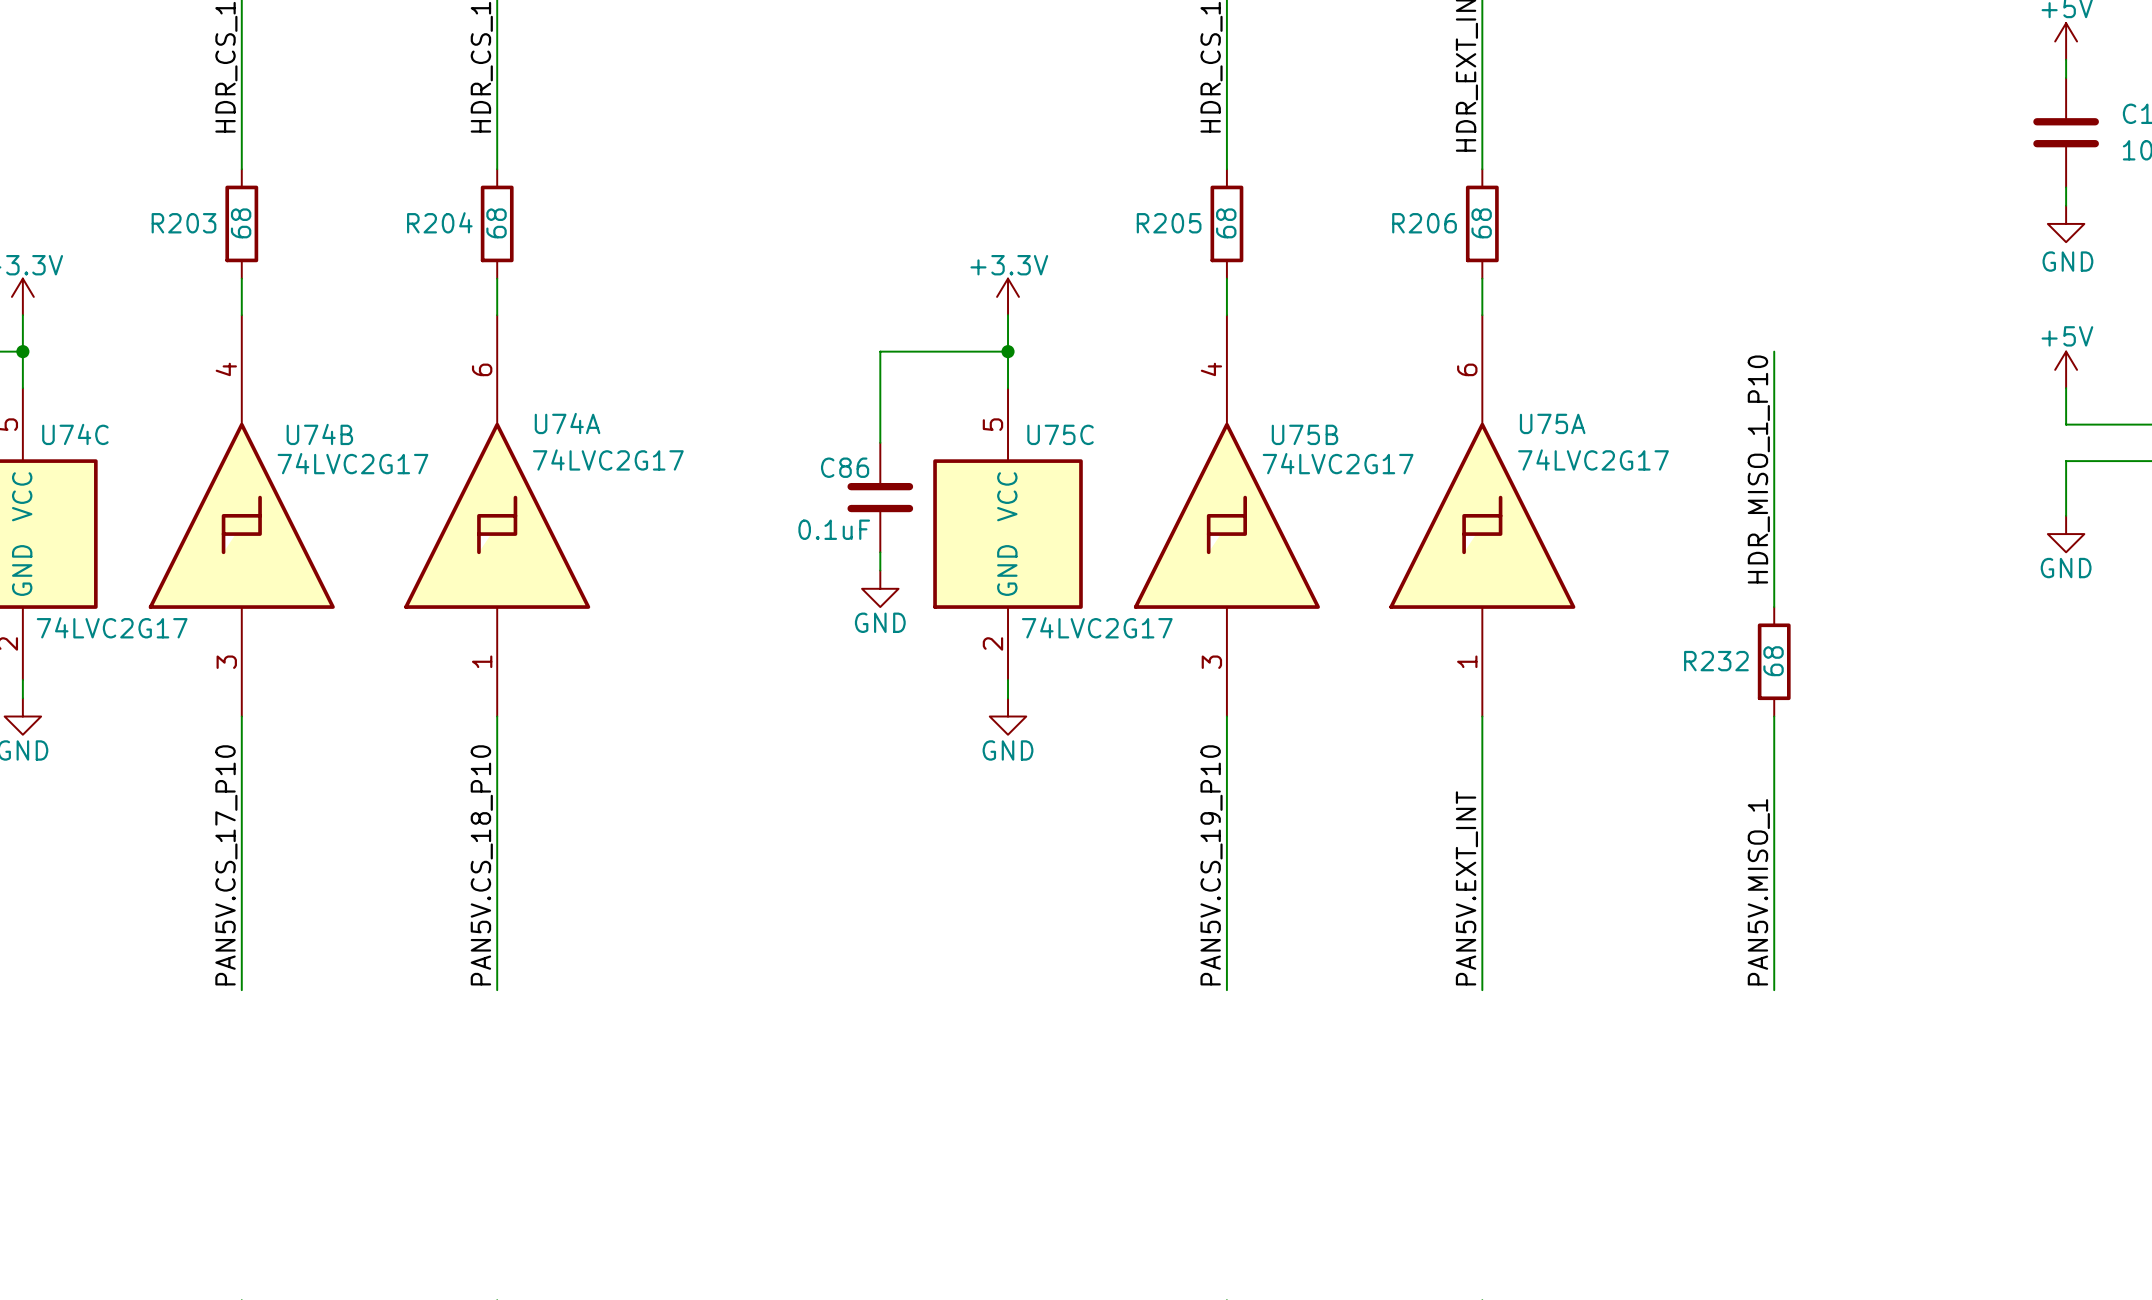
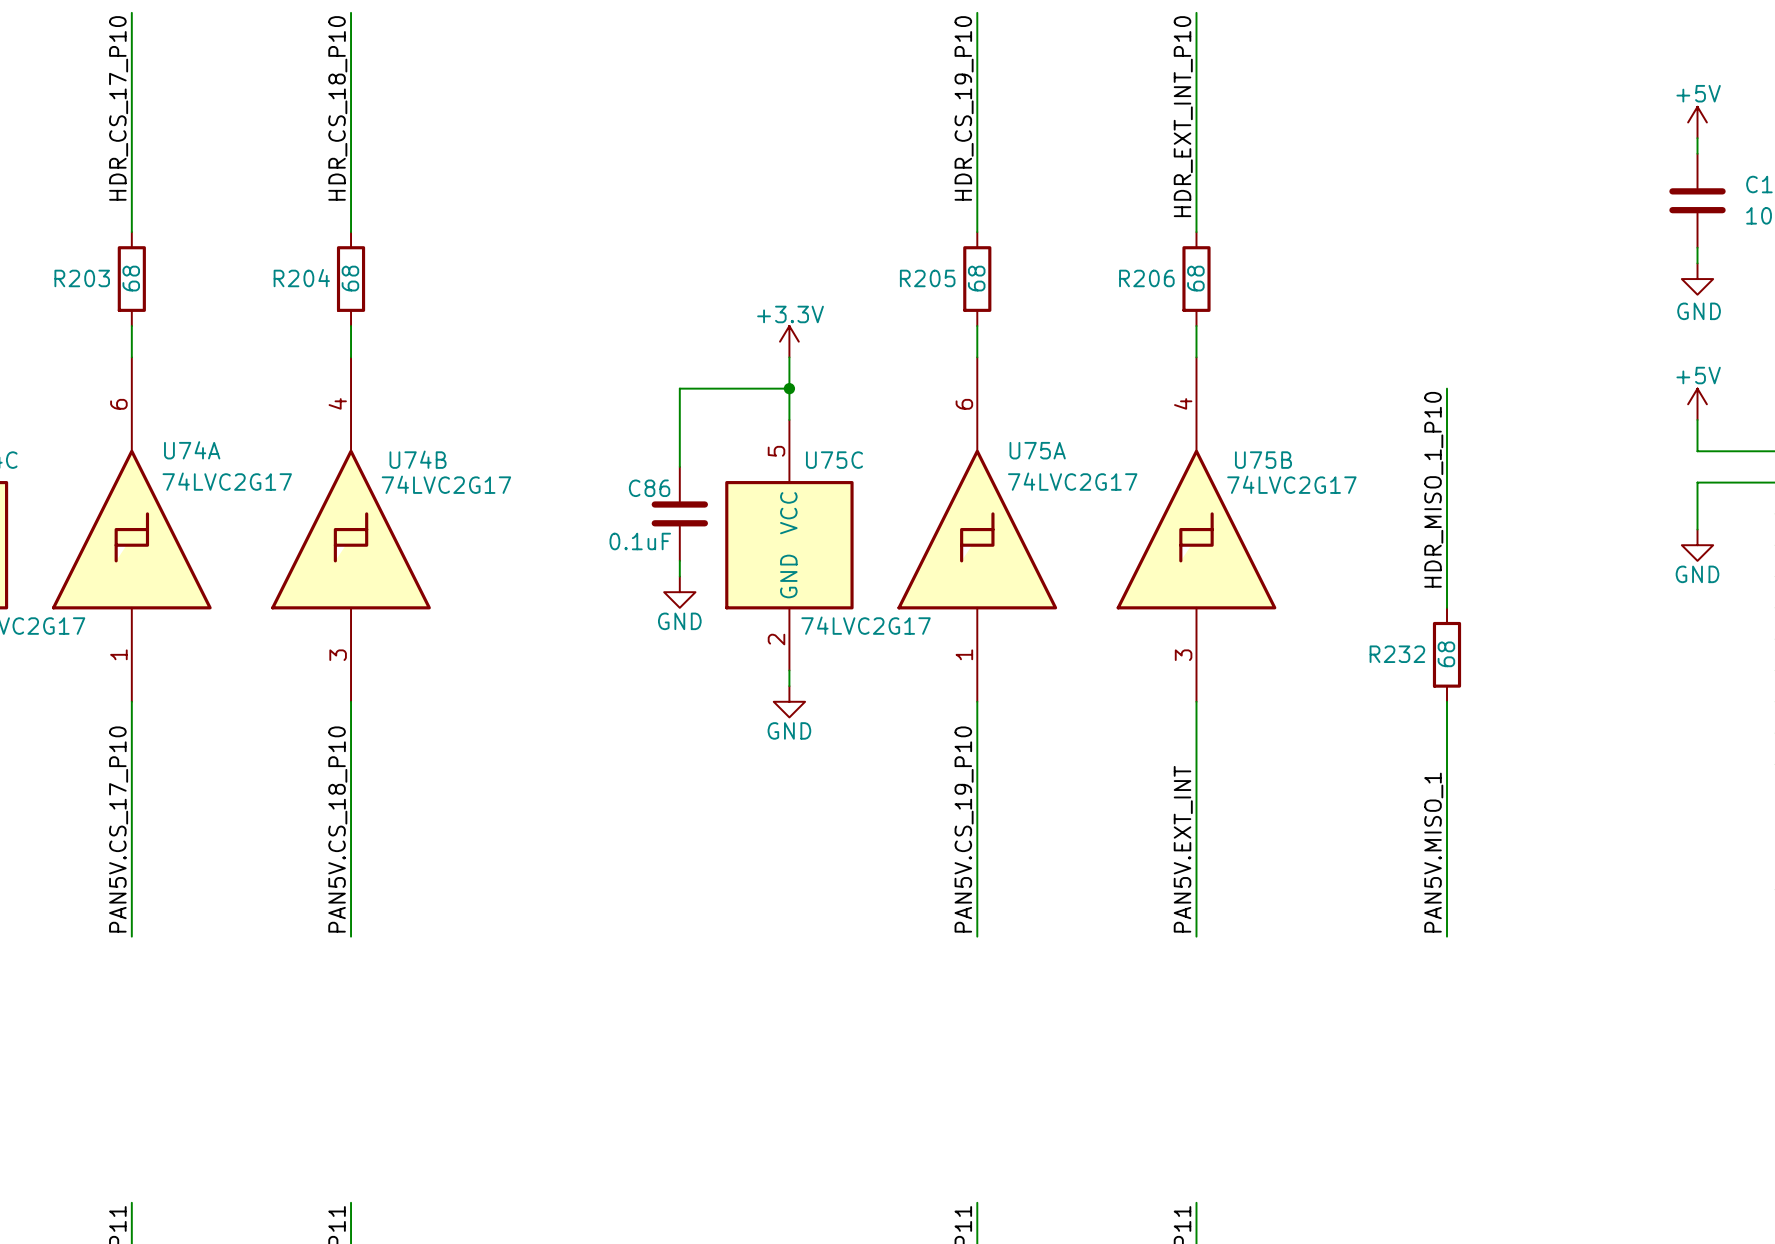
U74B position: (241, 515) -> (351, 529)
U74A position: (497, 515) -> (131, 529)
U75B position: (1226, 515) -> (1196, 529)
U75A position: (1482, 515) -> (977, 529)

